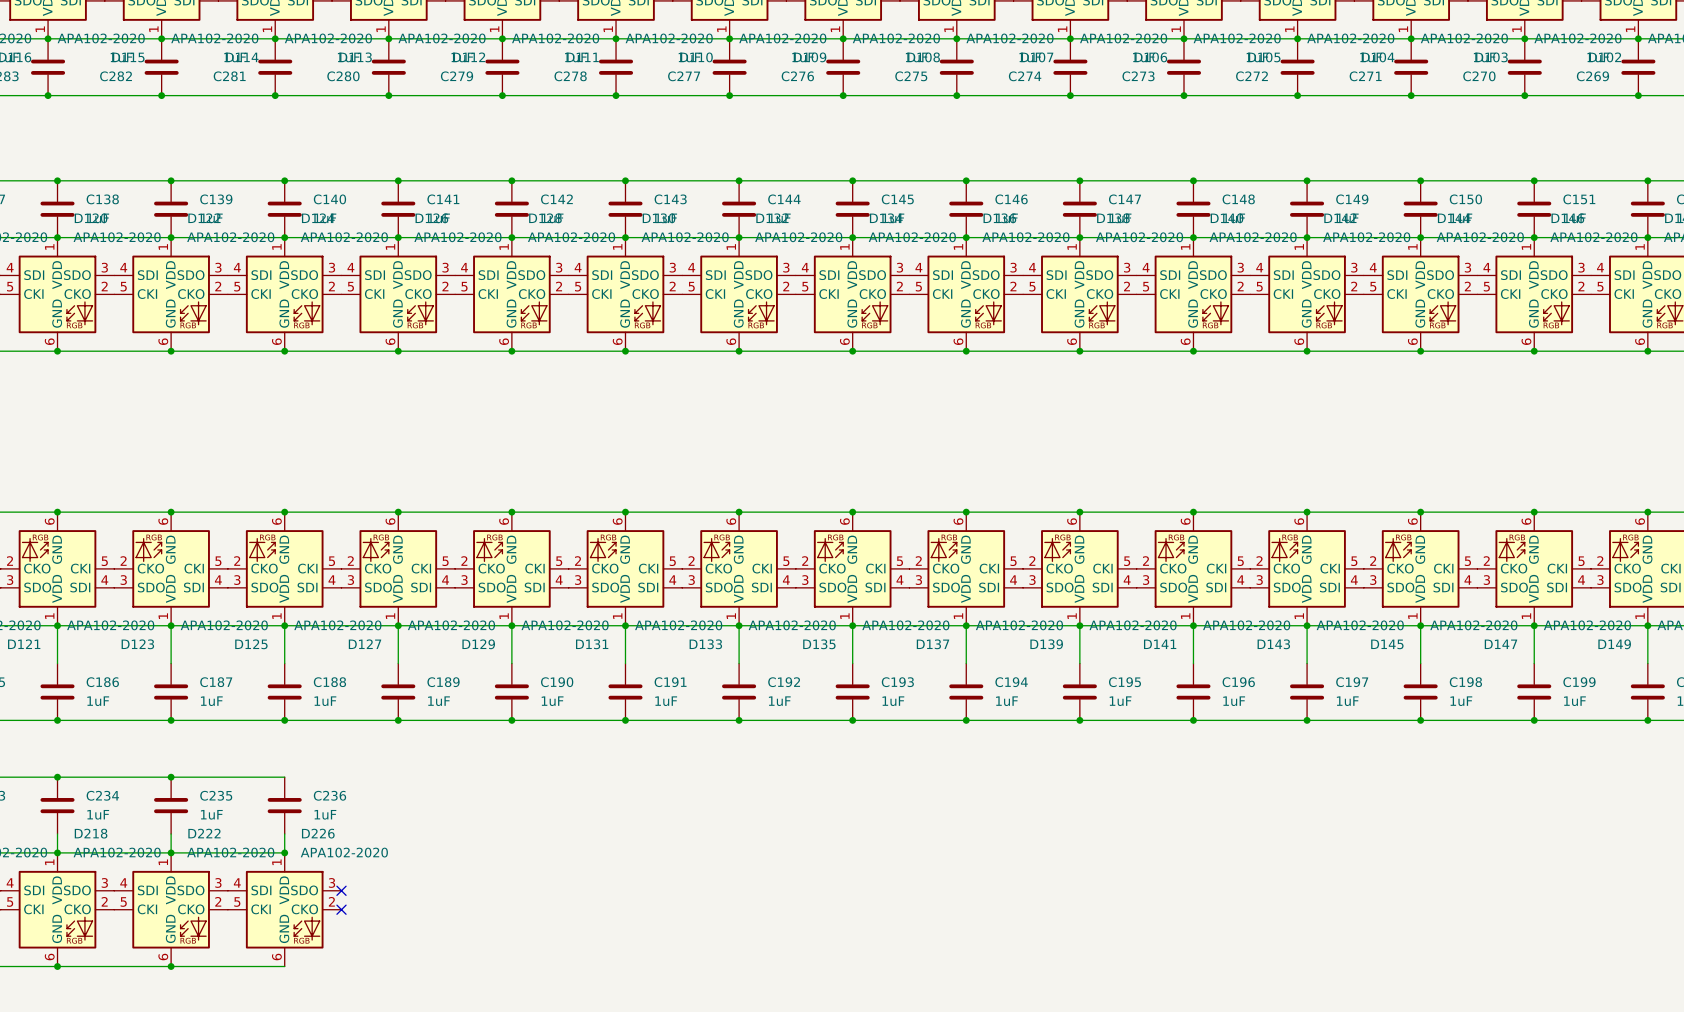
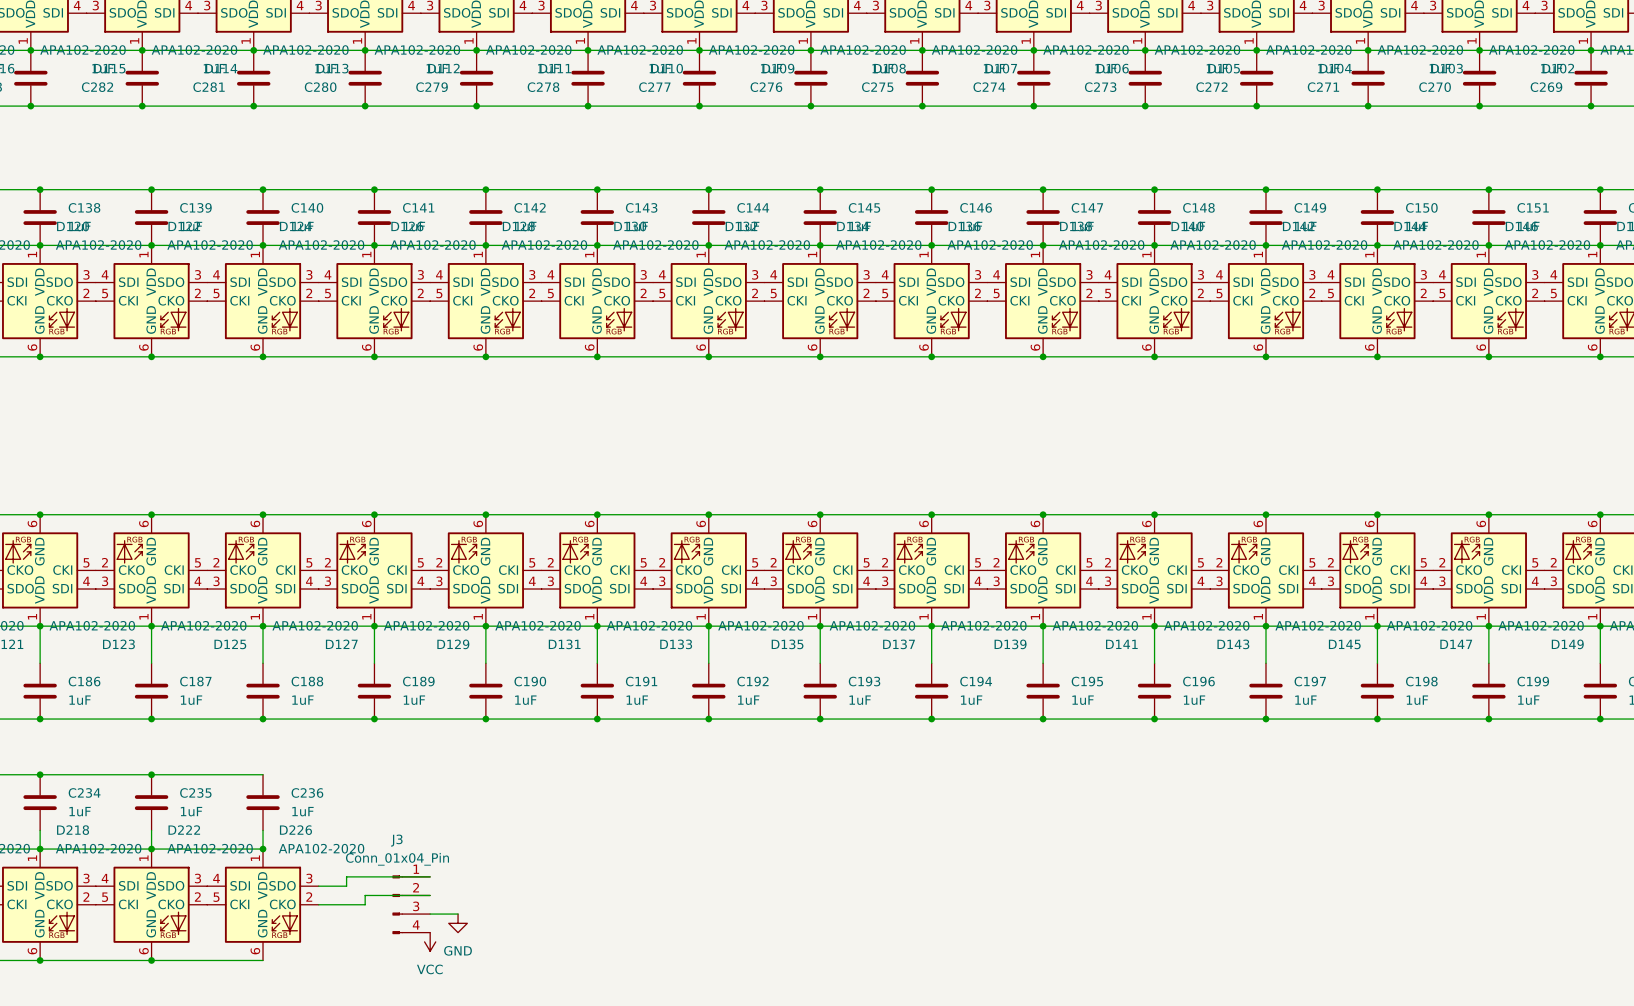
wire: none -> (430, 876) (346, 876) (346, 886) (318, 886)
no-connect mark: (341, 890) -> none
wire: none -> (430, 895) (365, 895) (365, 904) (318, 904)
no-connect mark: (341, 909) -> none
J3: none -> Conn_01x04_Pin (411, 904)
wire: none -> (430, 914) (458, 914)
power symbol: none -> GND (458, 923)
power symbol: none -> VCC (430, 941)

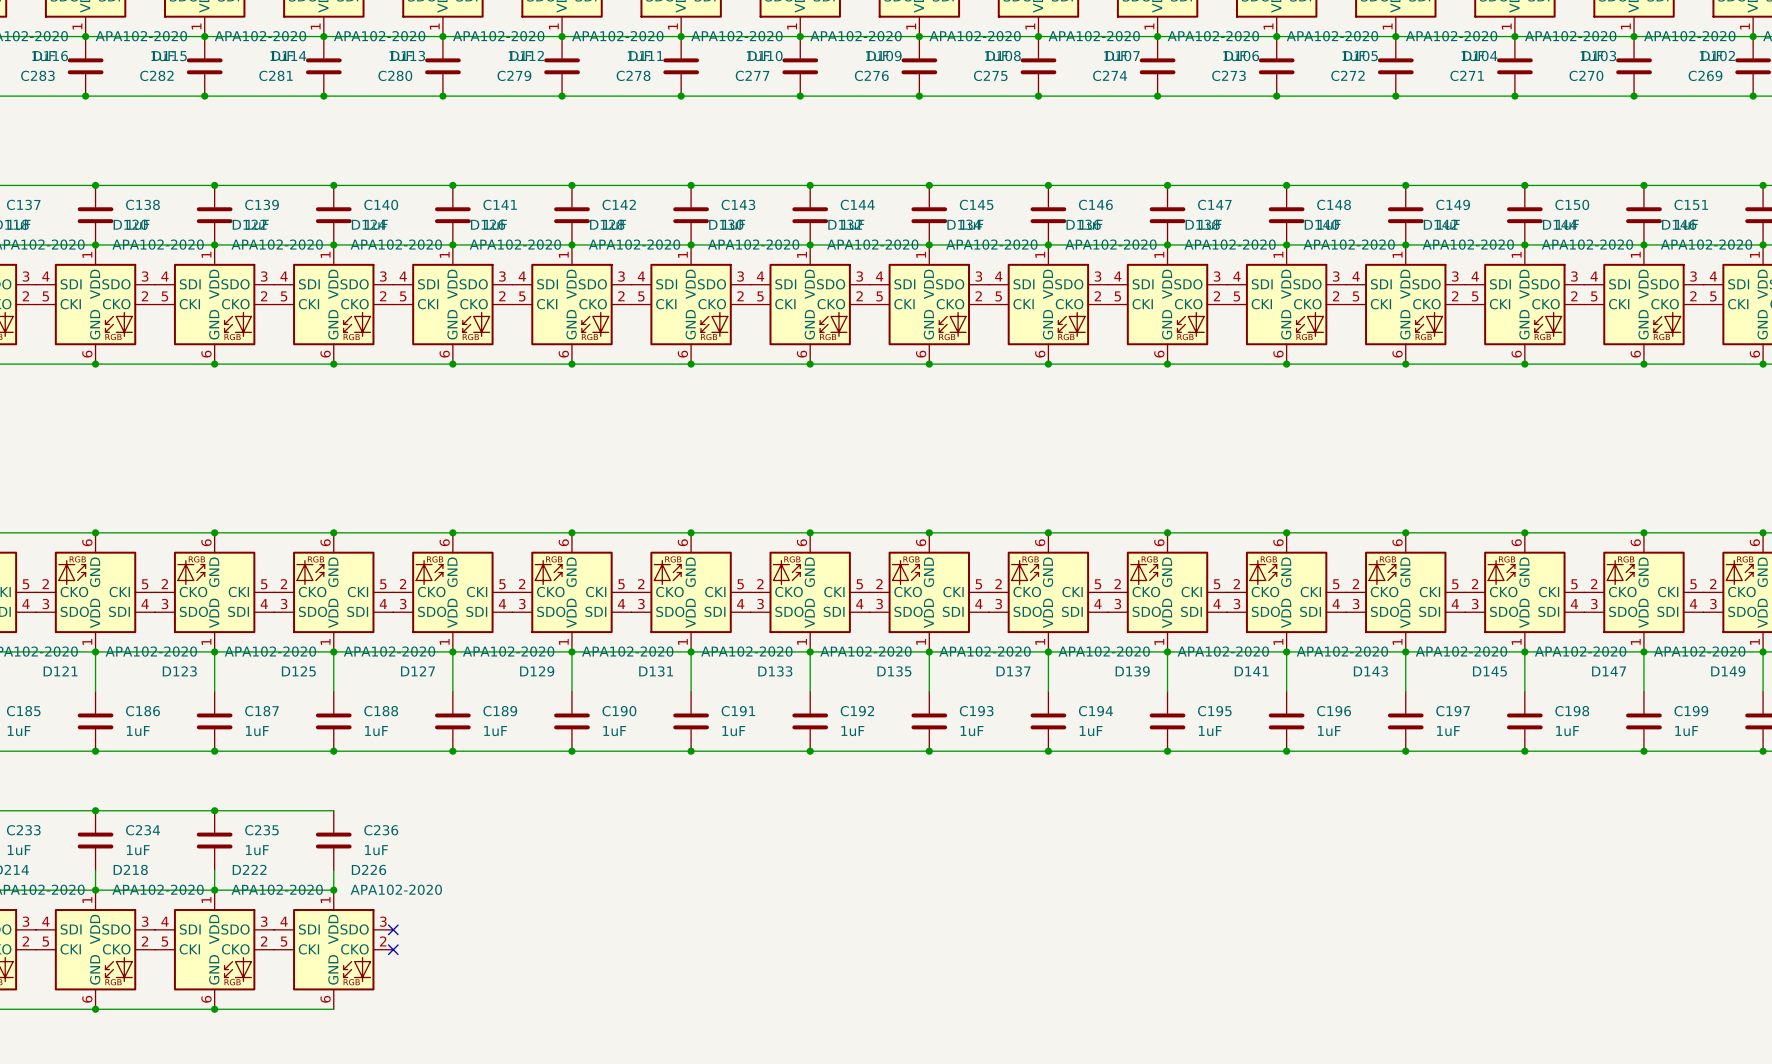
wire: (430, 876) (346, 876) (346, 886) (318, 886) -> none
no-connect mark: none -> (393, 929)
wire: (430, 895) (365, 895) (365, 904) (318, 904) -> none
no-connect mark: none -> (393, 949)
J3: Conn_01x04_Pin (411, 904) -> none
wire: (430, 914) (458, 914) -> none
power symbol: GND (458, 923) -> none
power symbol: VCC (430, 941) -> none

